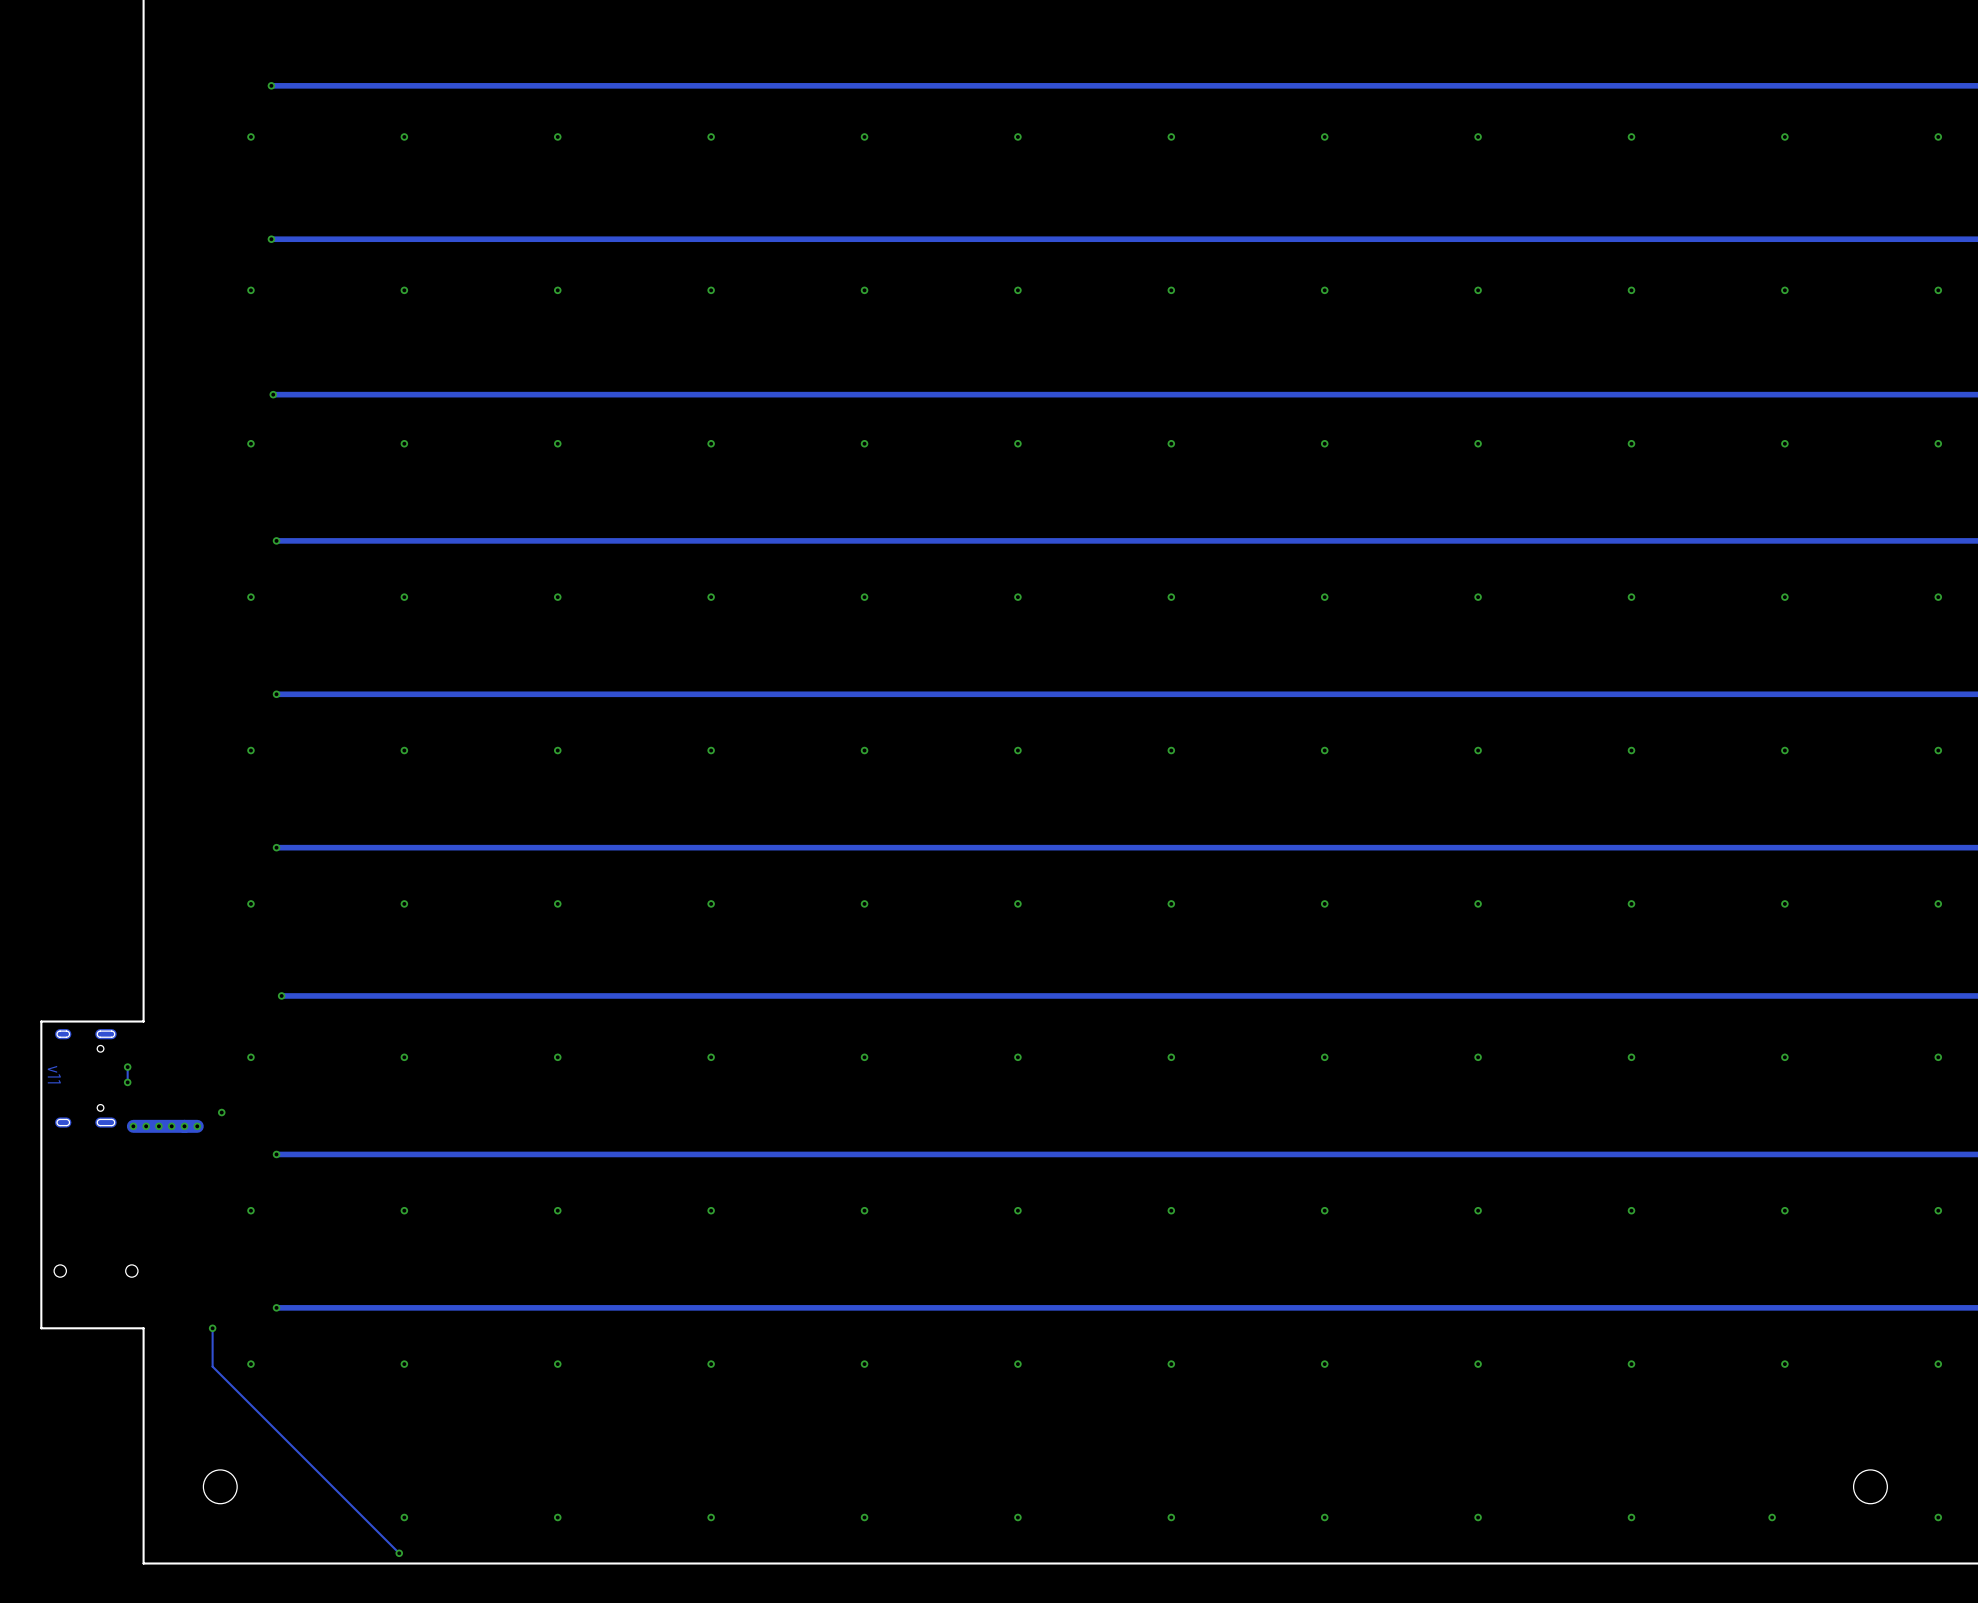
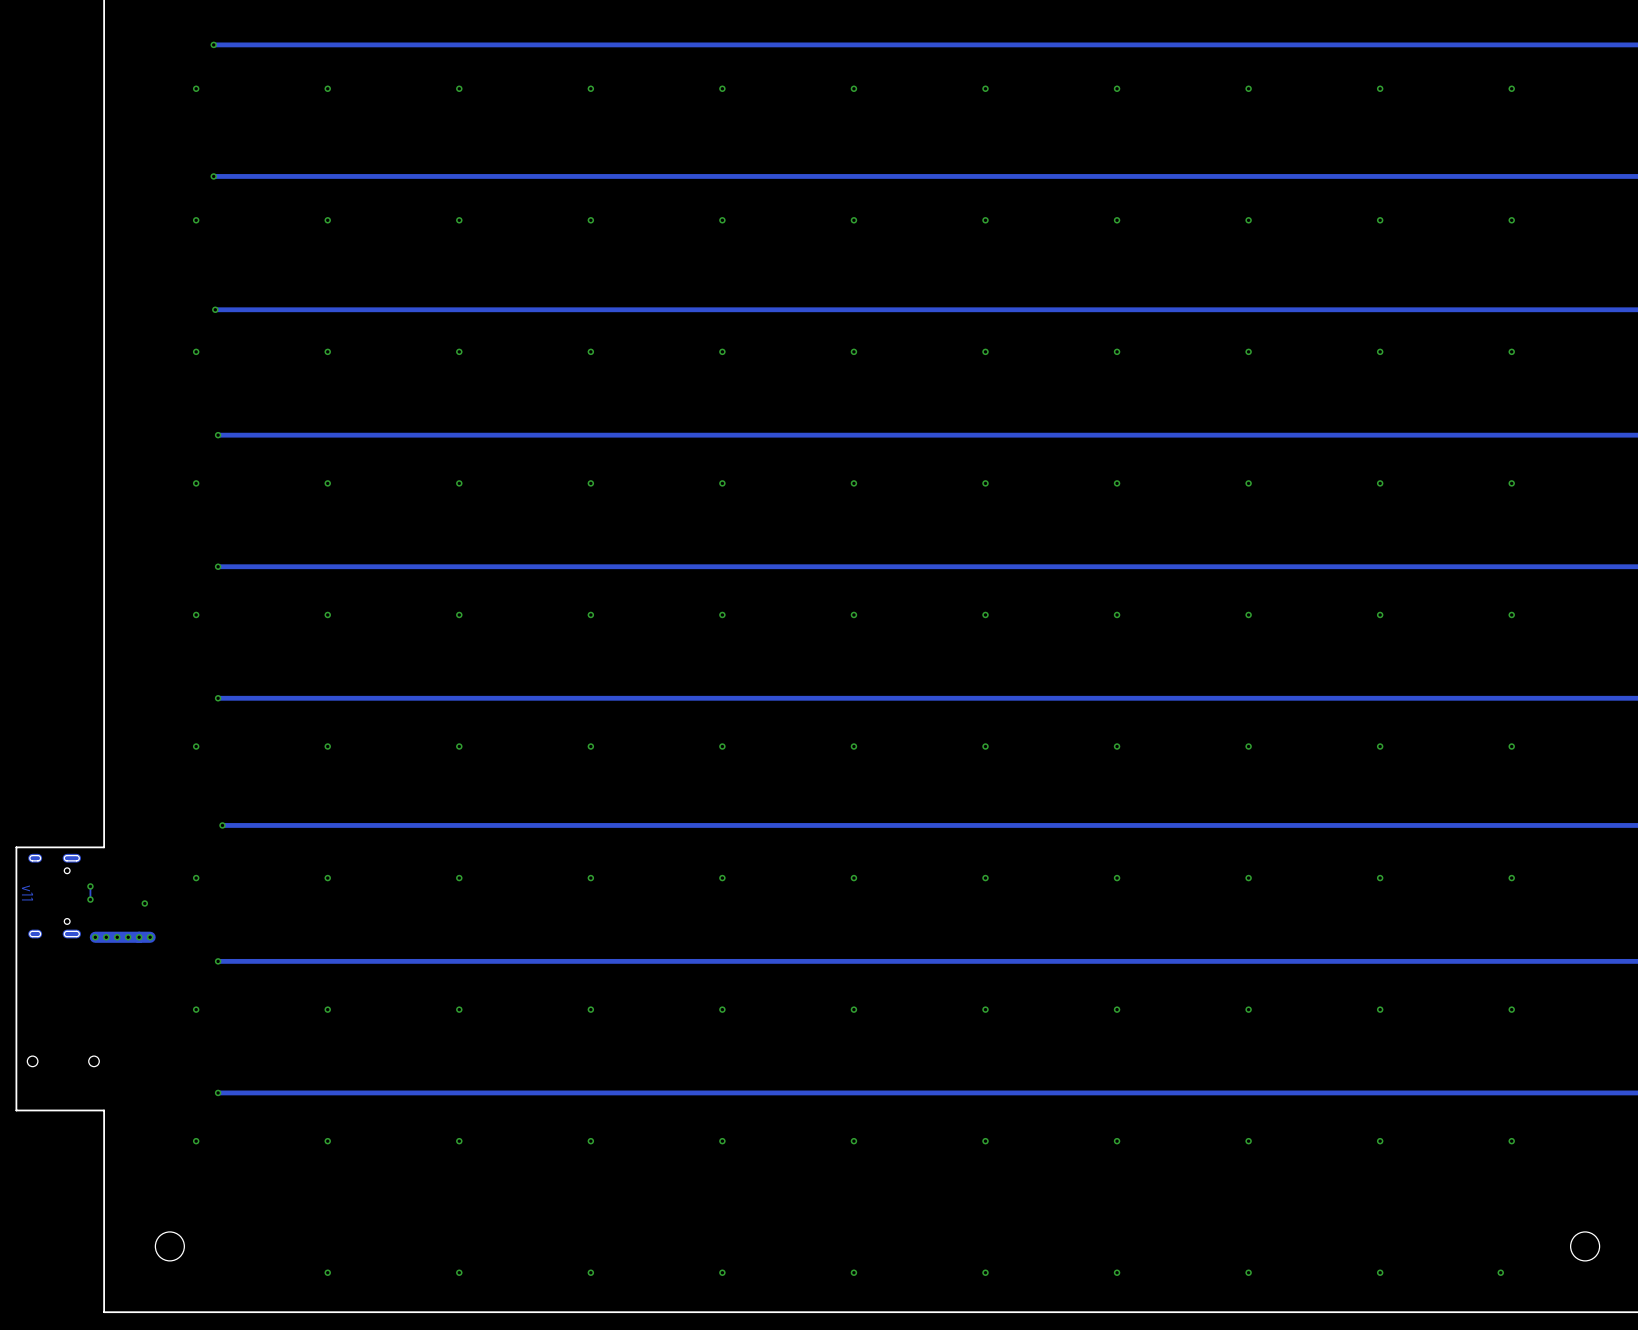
via position: (221, 1112) -> (144, 903)
track: (212, 1328) (212, 1366) (399, 1553) -> none
via: (212, 1328) -> none
via: (399, 1553) -> none

